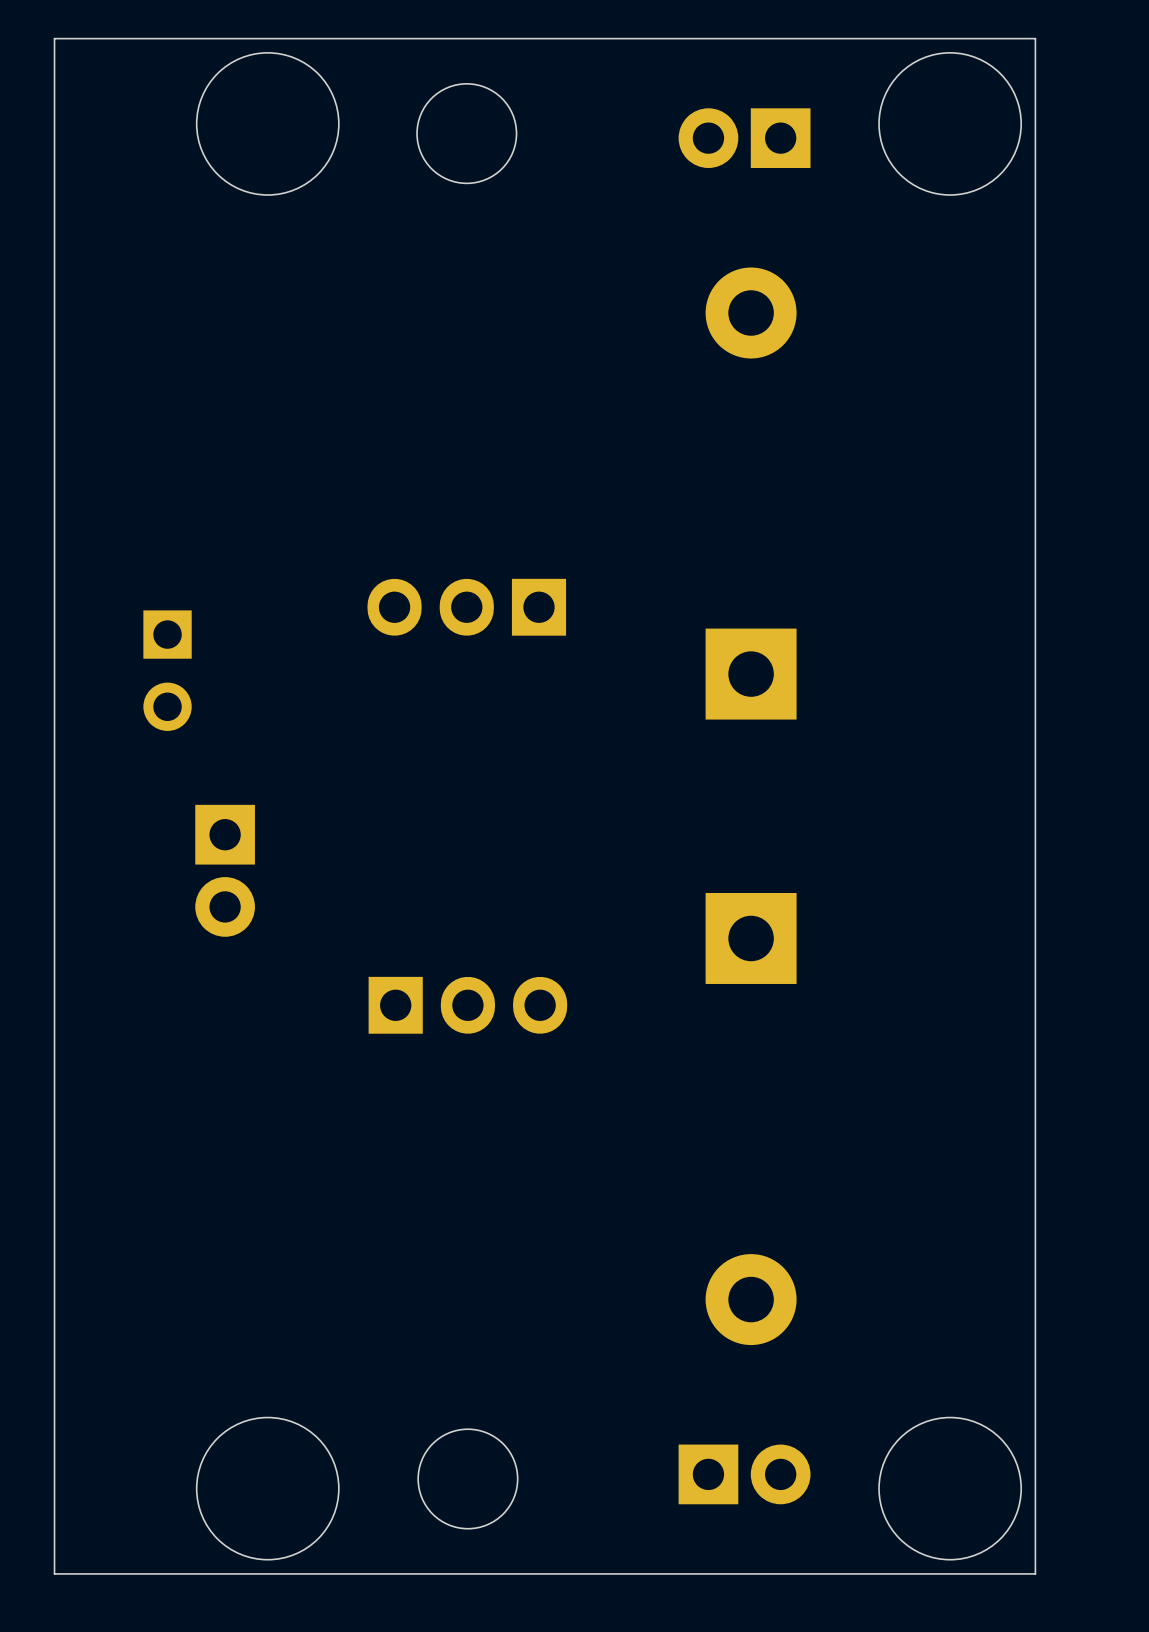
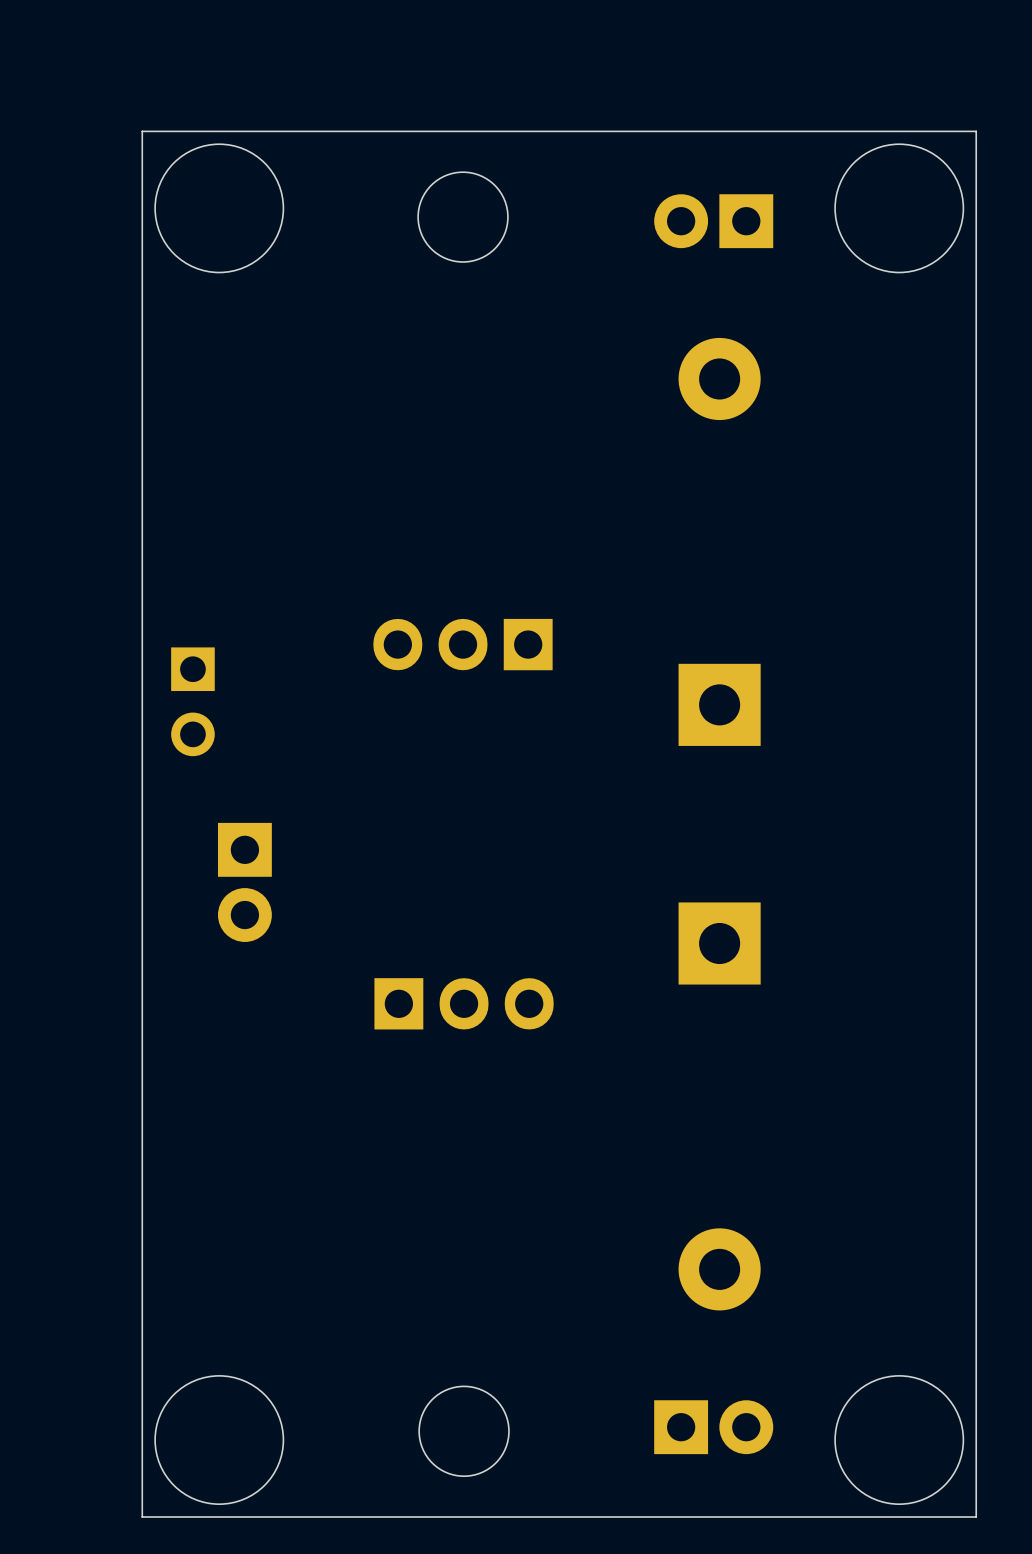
board edge: (111, 38) (54, 38) (54, 1573) (111, 1573) -> (142, 131) (142, 1517)
round board edge position: (267, 123) -> (219, 208)
round board edge position: (267, 1488) -> (219, 1440)

